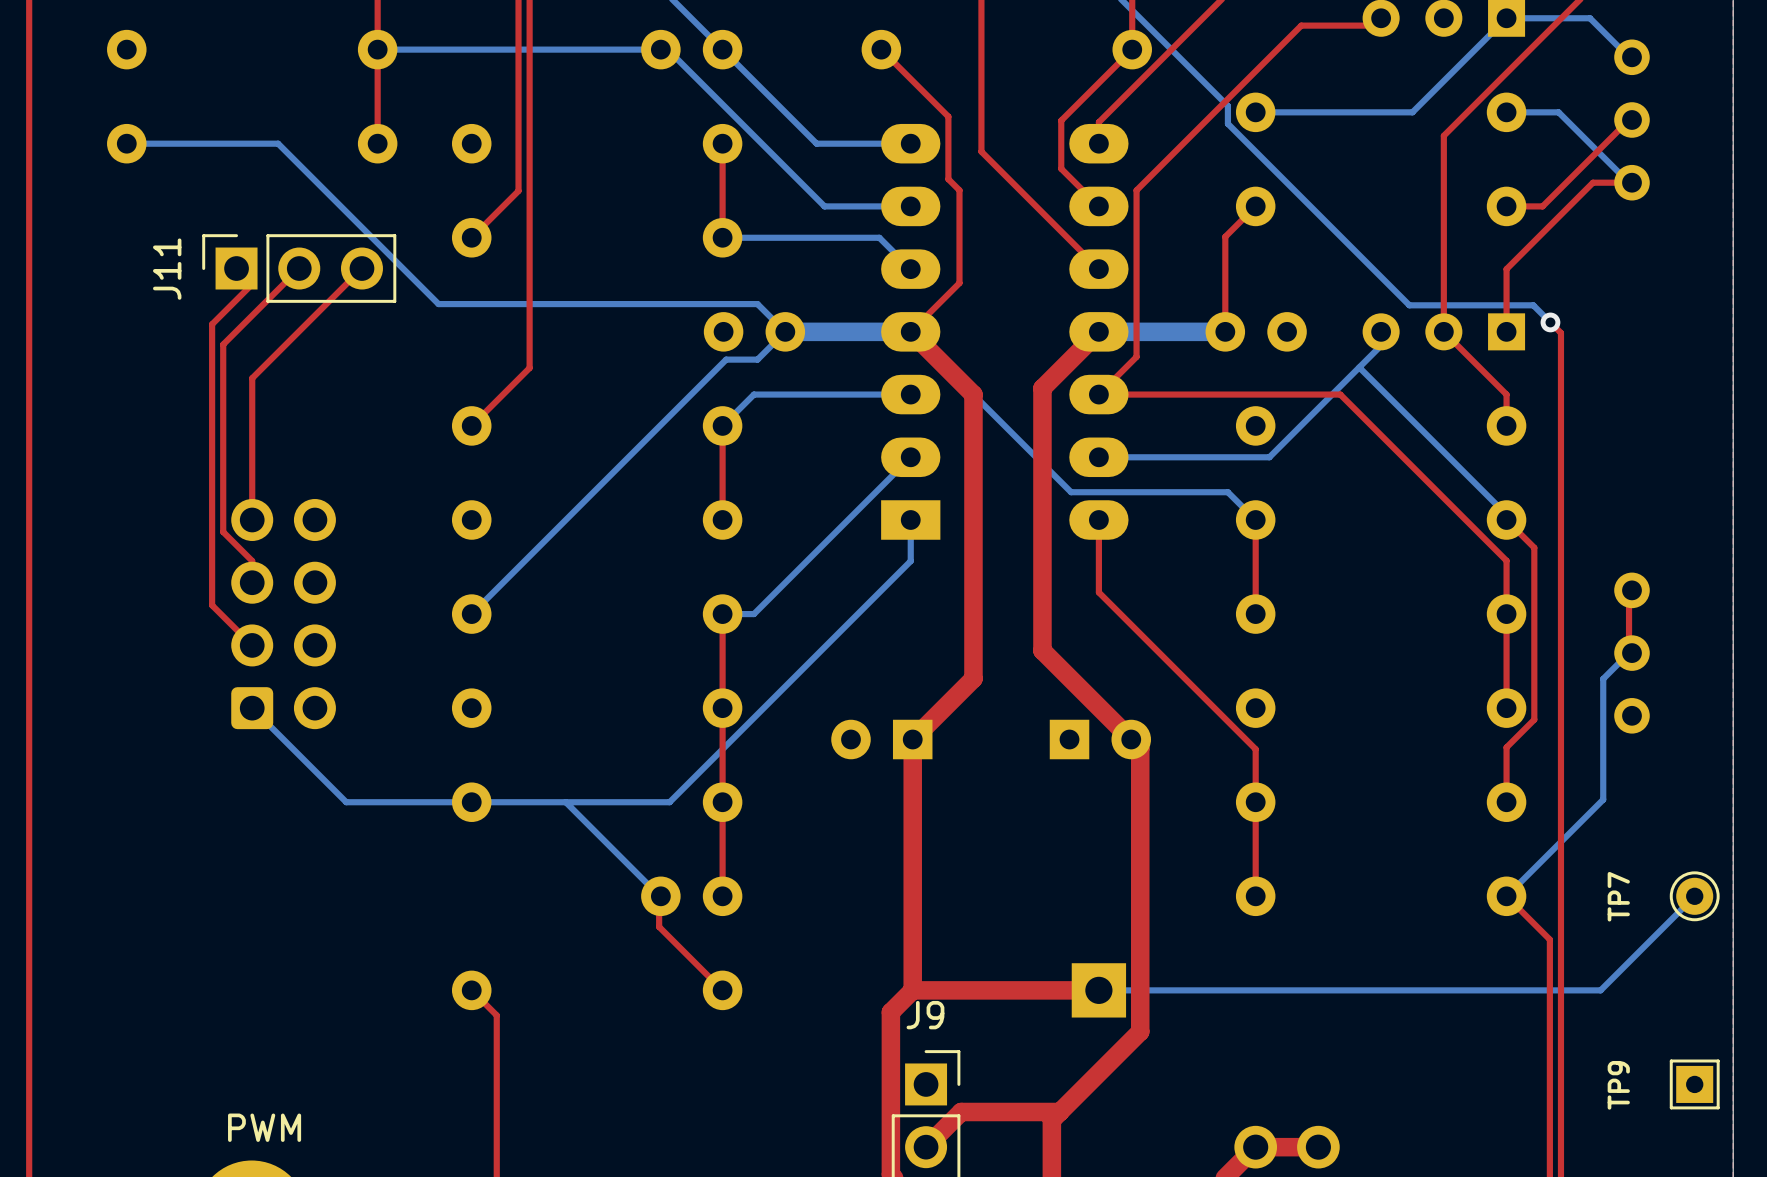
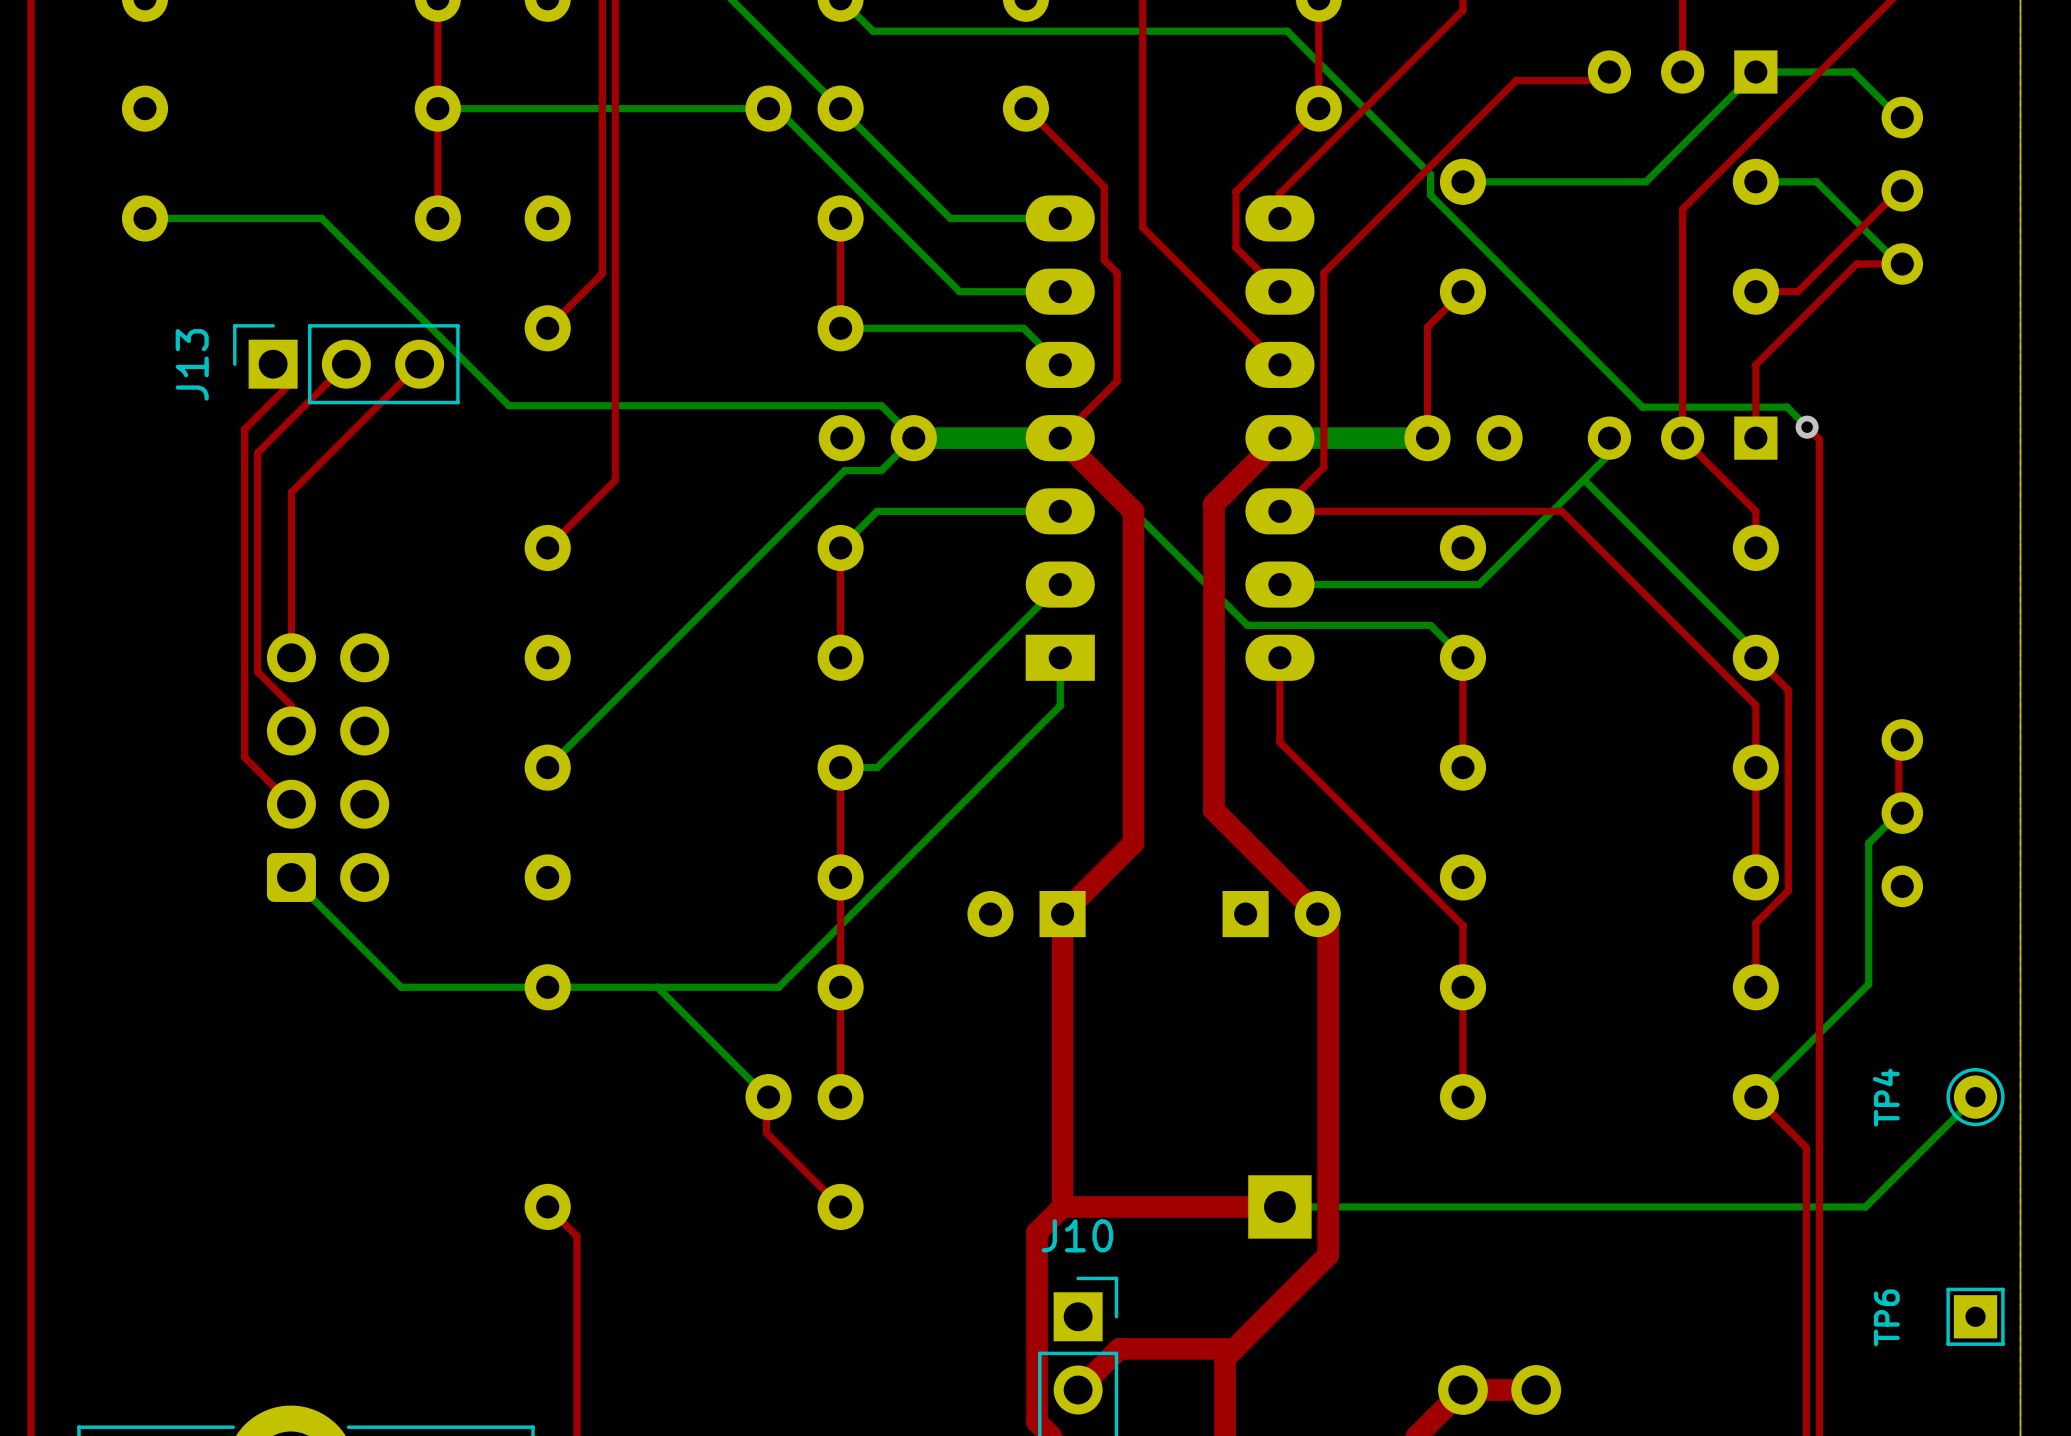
J11 name: J11 (167, 269) -> J13 (192, 364)
TP7 name: TP7 (1618, 896) -> TP4 (1886, 1097)
J9 name: J9 (925, 1015) -> J10 (1077, 1235)
TP9 name: TP9 (1618, 1085) -> TP6 (1886, 1317)
text: PWM (264, 1127) -> none

